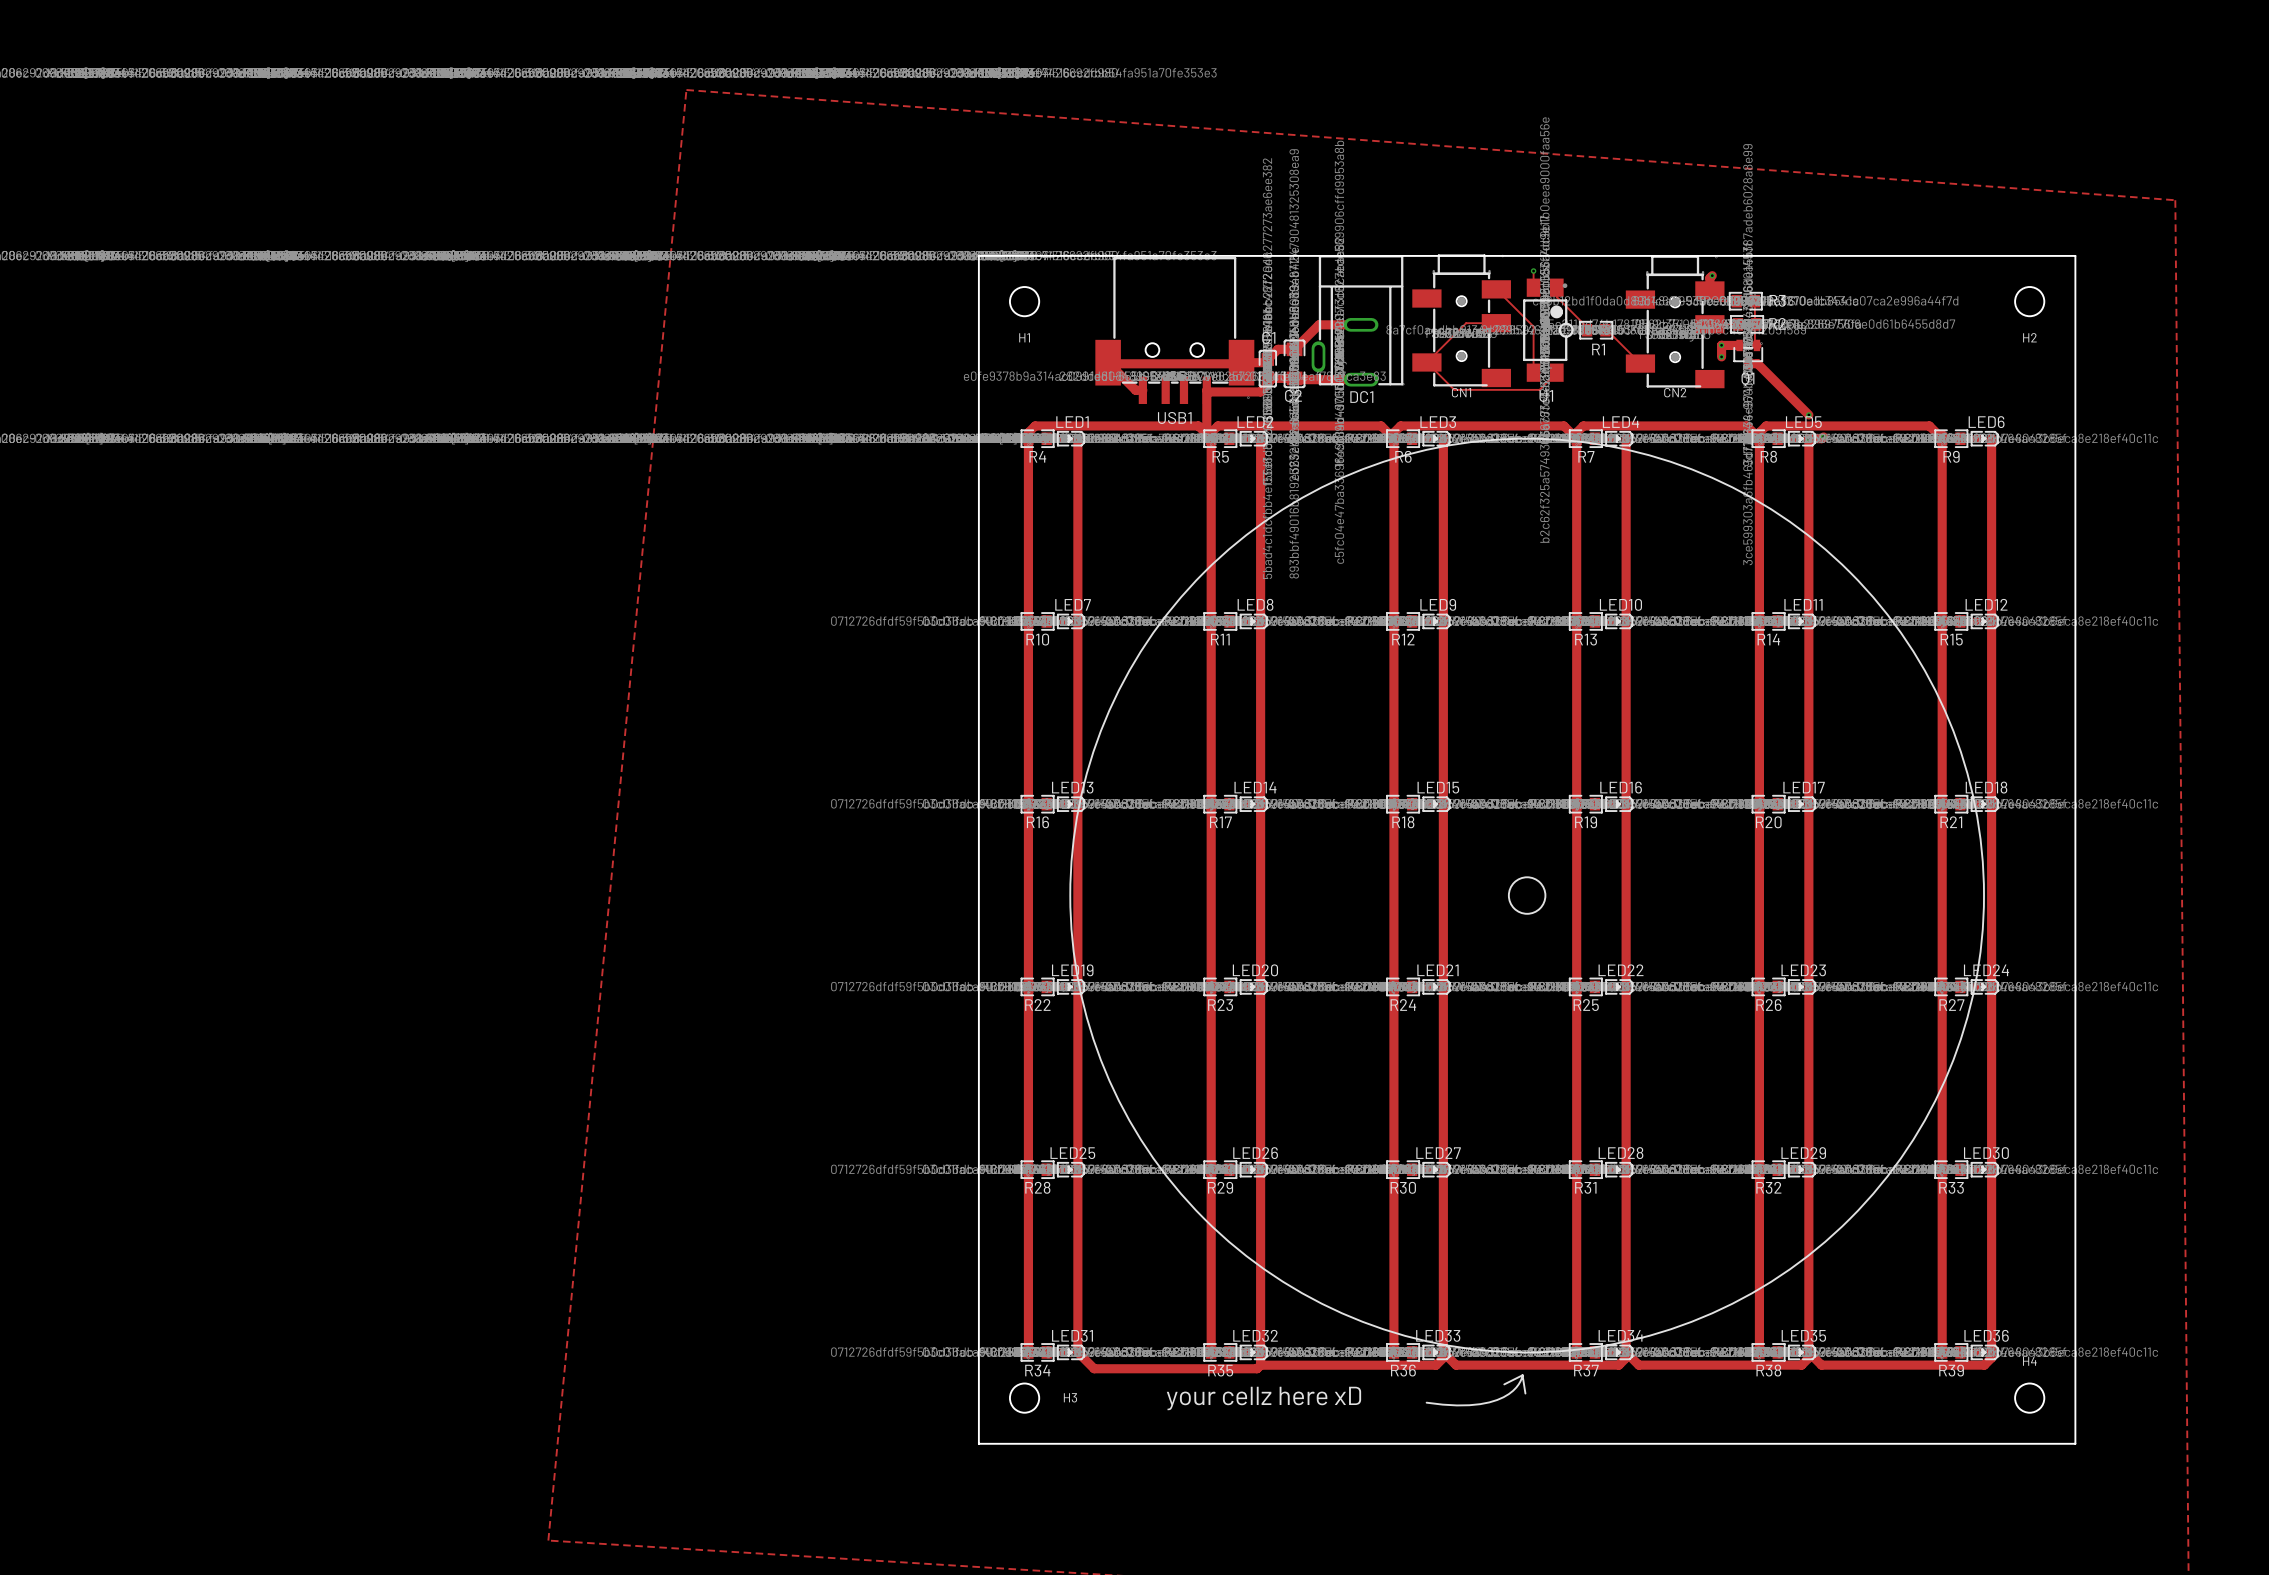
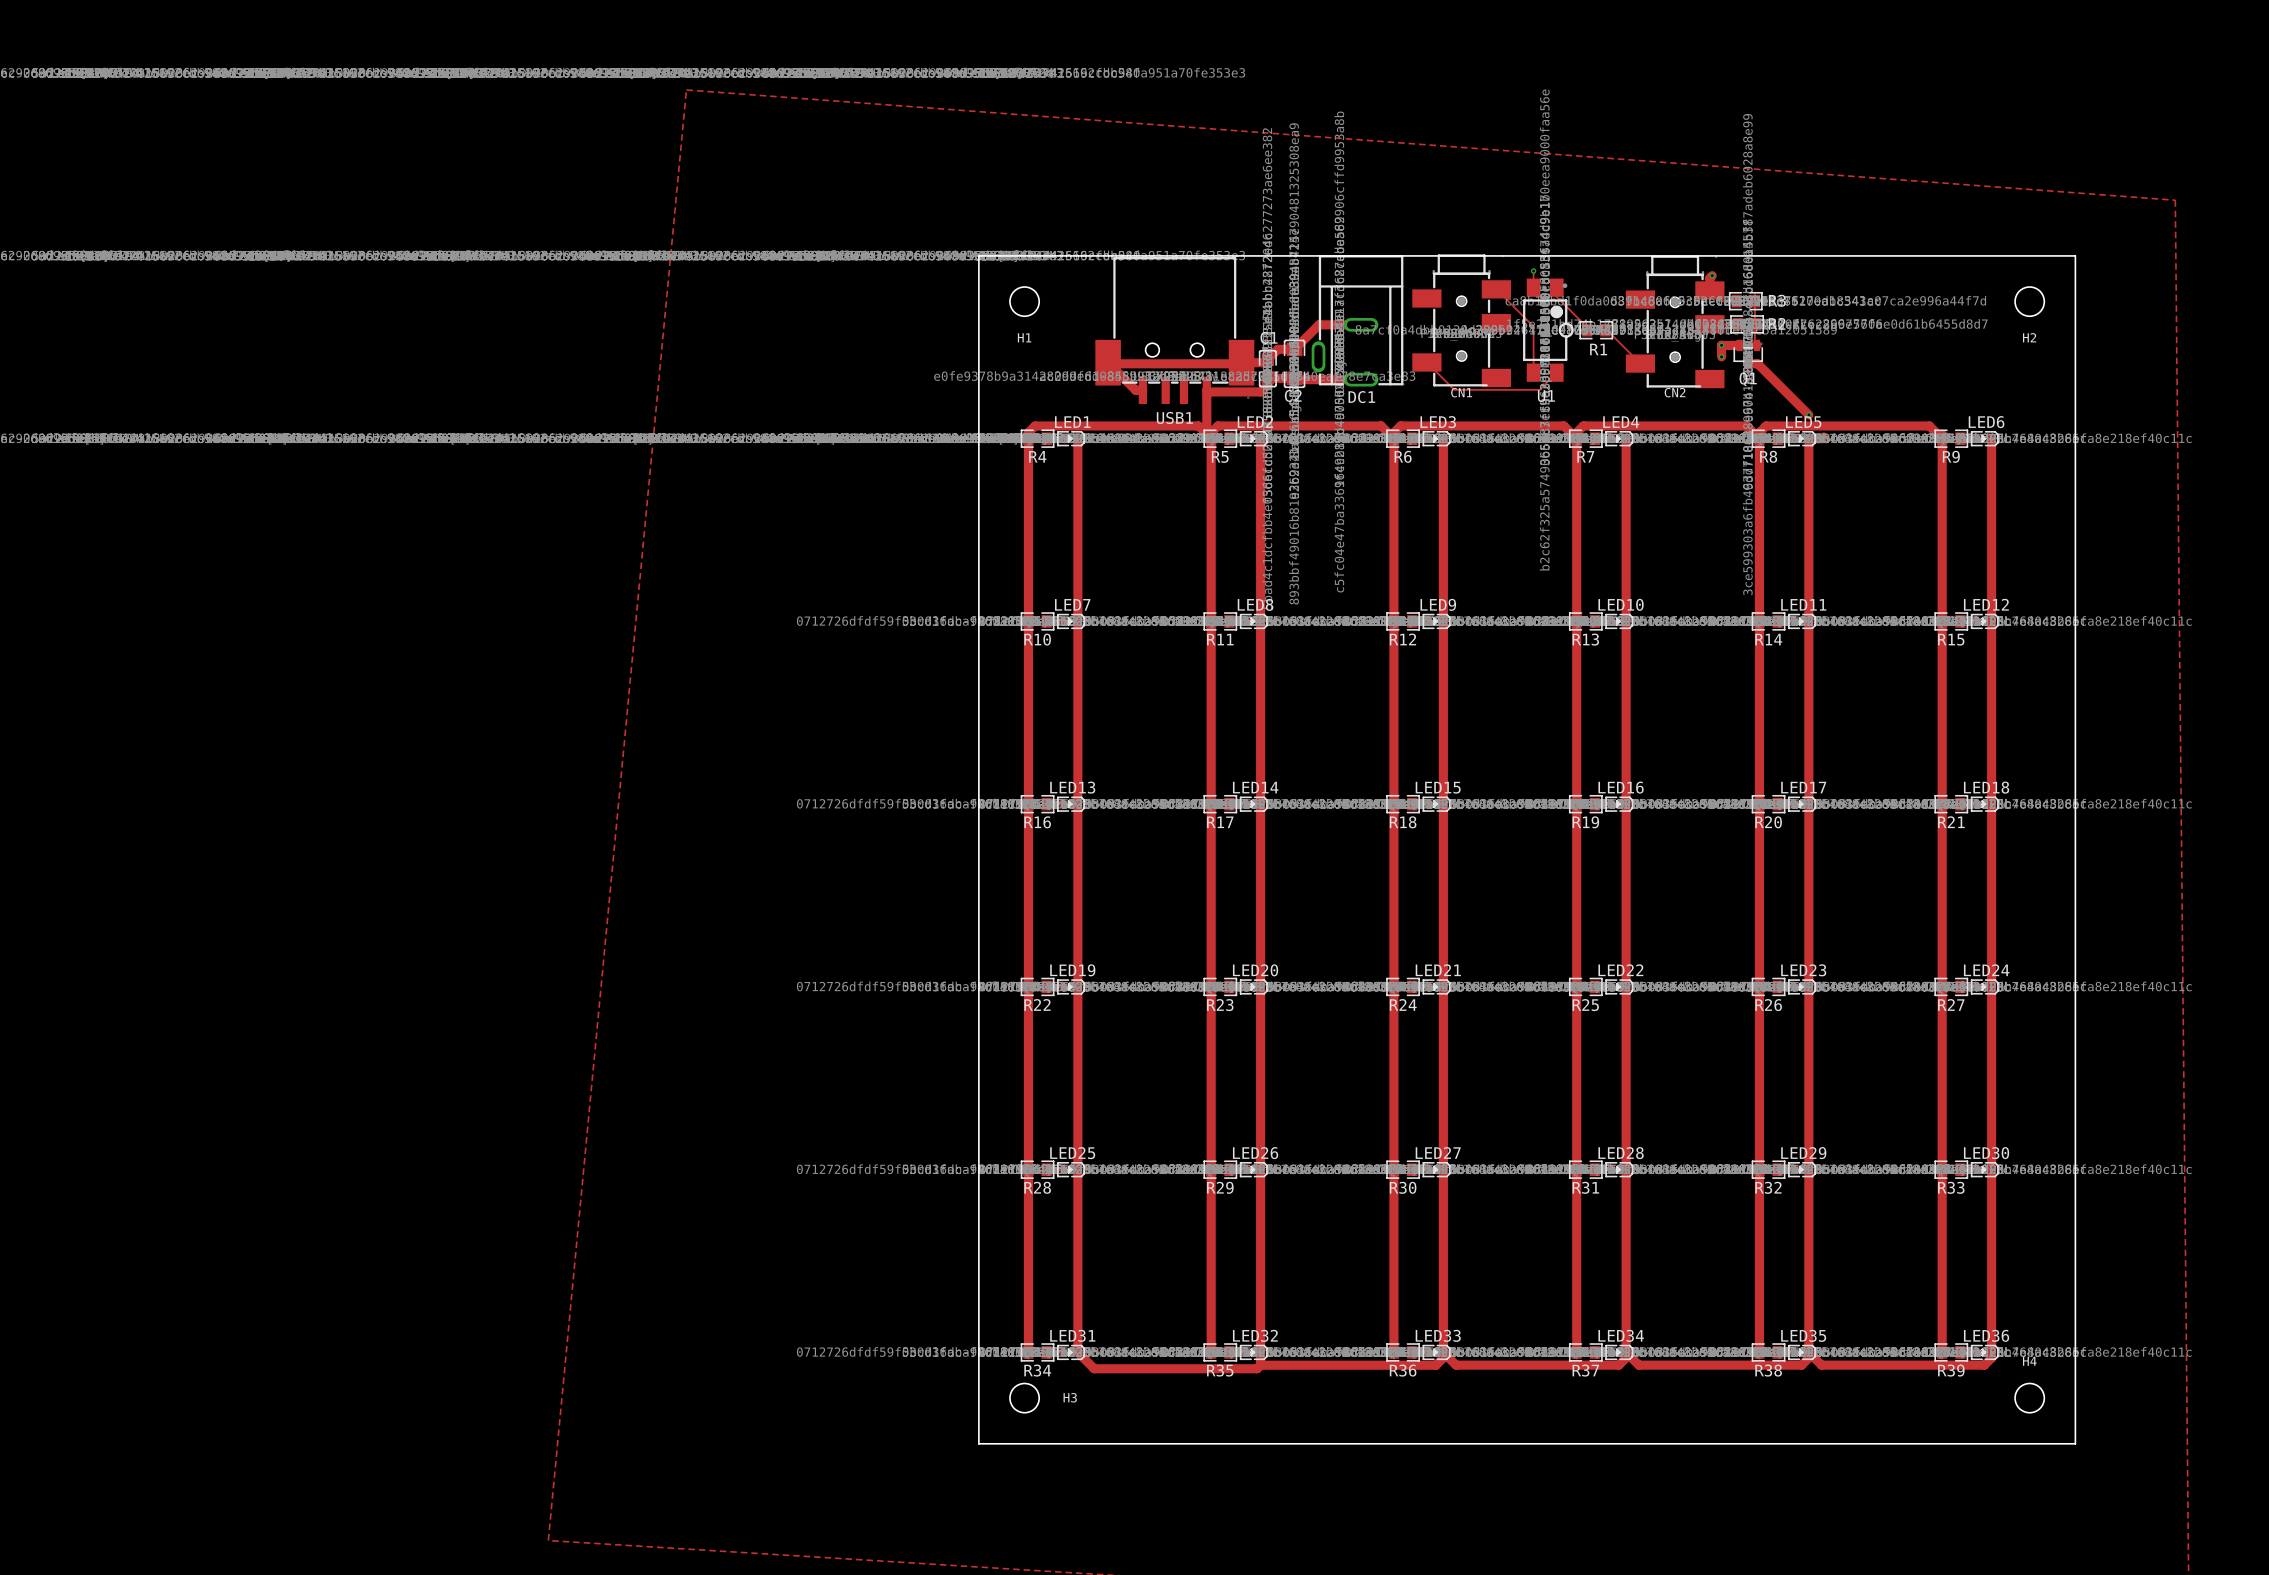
track: (1496, 323) (1466, 323) (1426, 362) -> none
drawing: [1069, 437, 1985, 1354] -> none
line: (1522, 1375) (1525, 1393) -> none
line: (1522, 1375) (1504, 1384) -> none
line: (1522, 1375) (1513, 1390) (1503, 1397) (1489, 1402) (1456, 1405) (1426, 1402) -> none
text: your cellz here xD (1263, 1398) -> none

